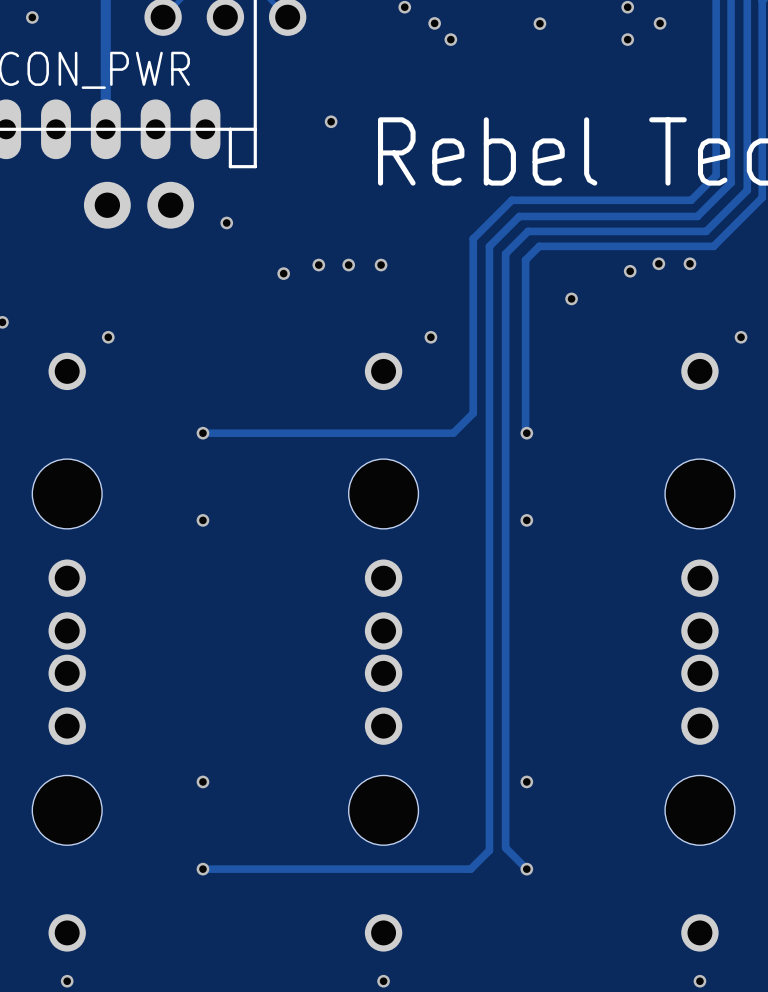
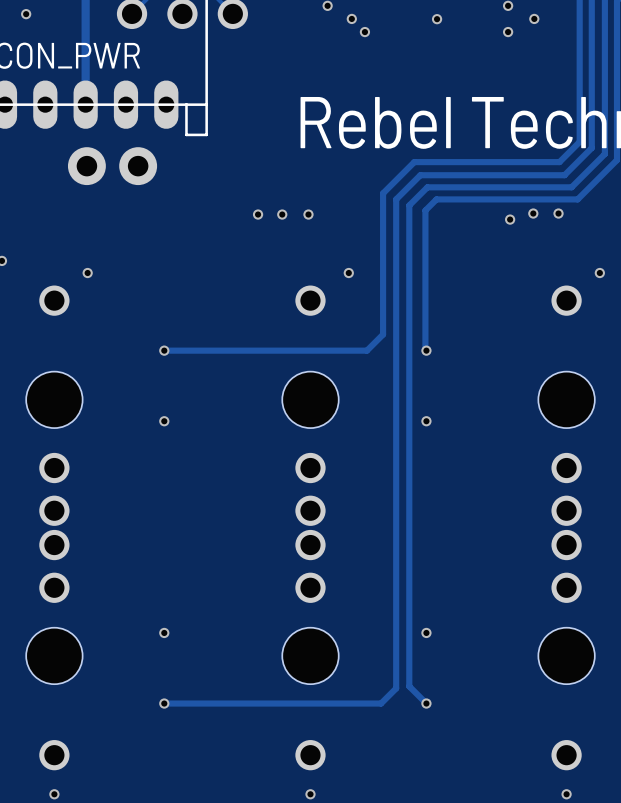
via: (331, 121) -> none
via: (226, 222) -> none
via: (283, 273) -> none
via: (571, 298) -> none

